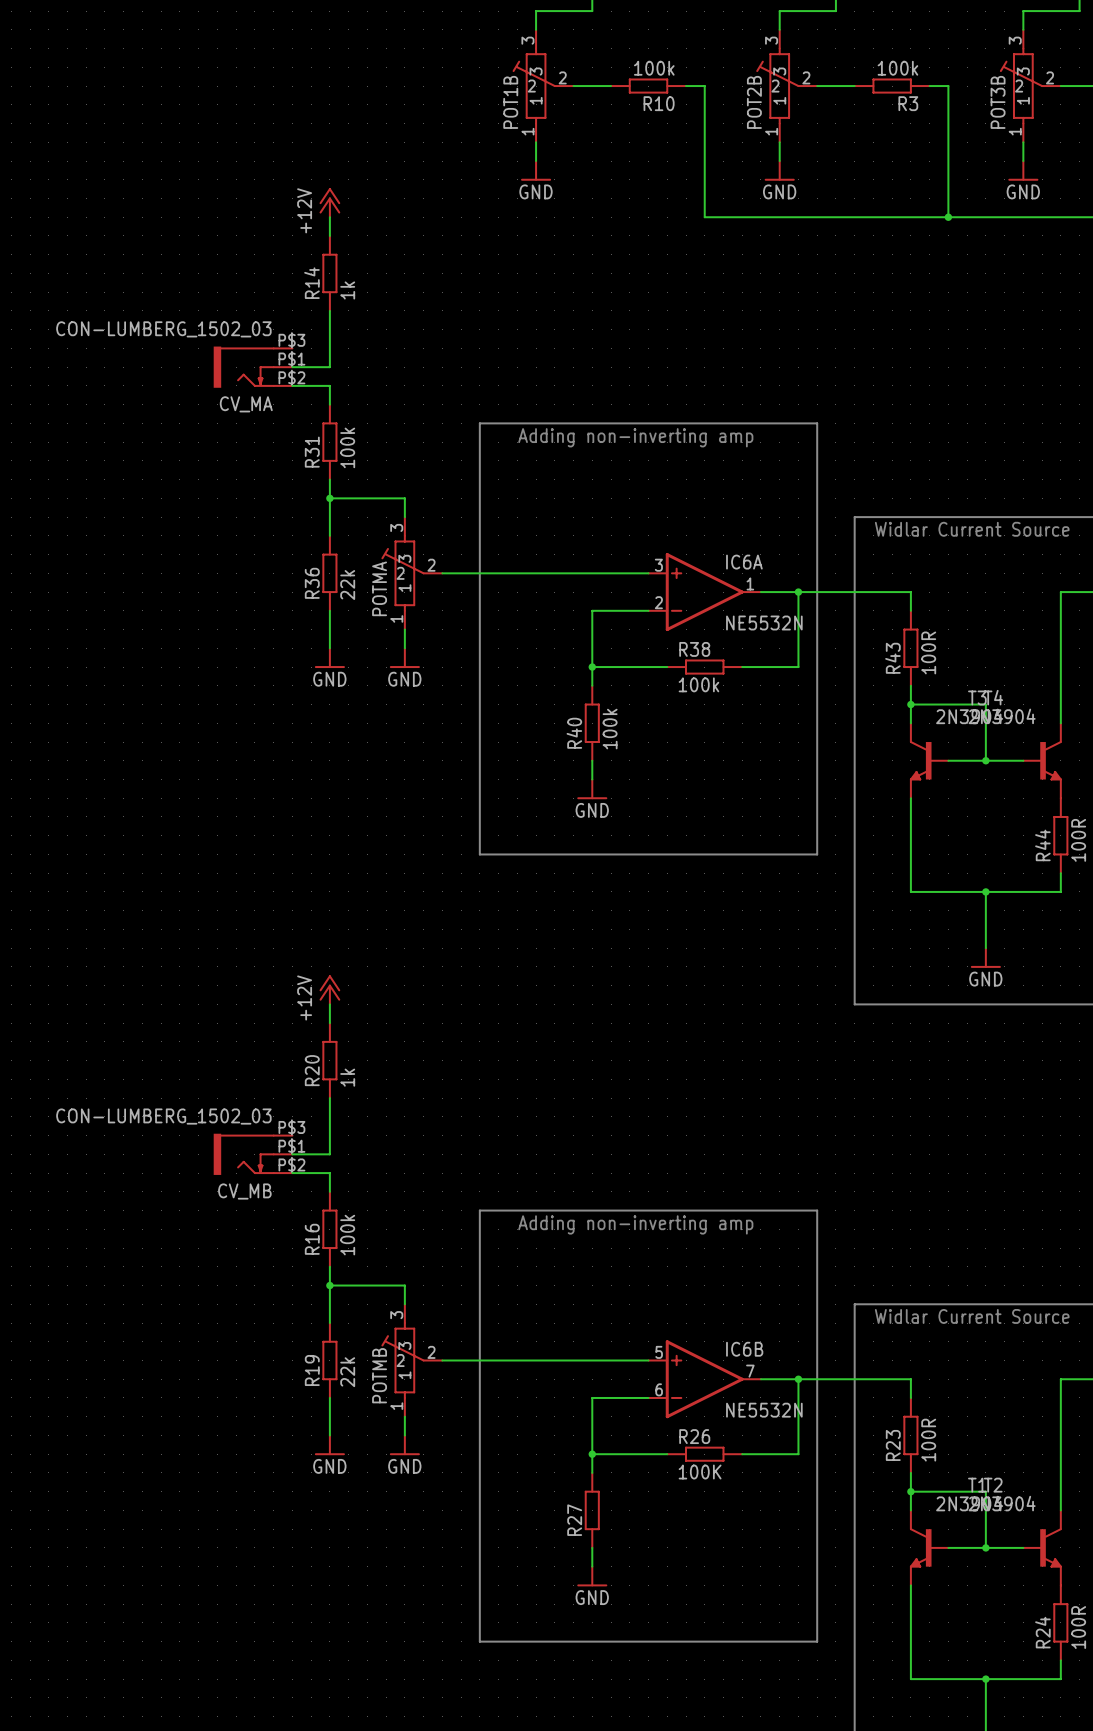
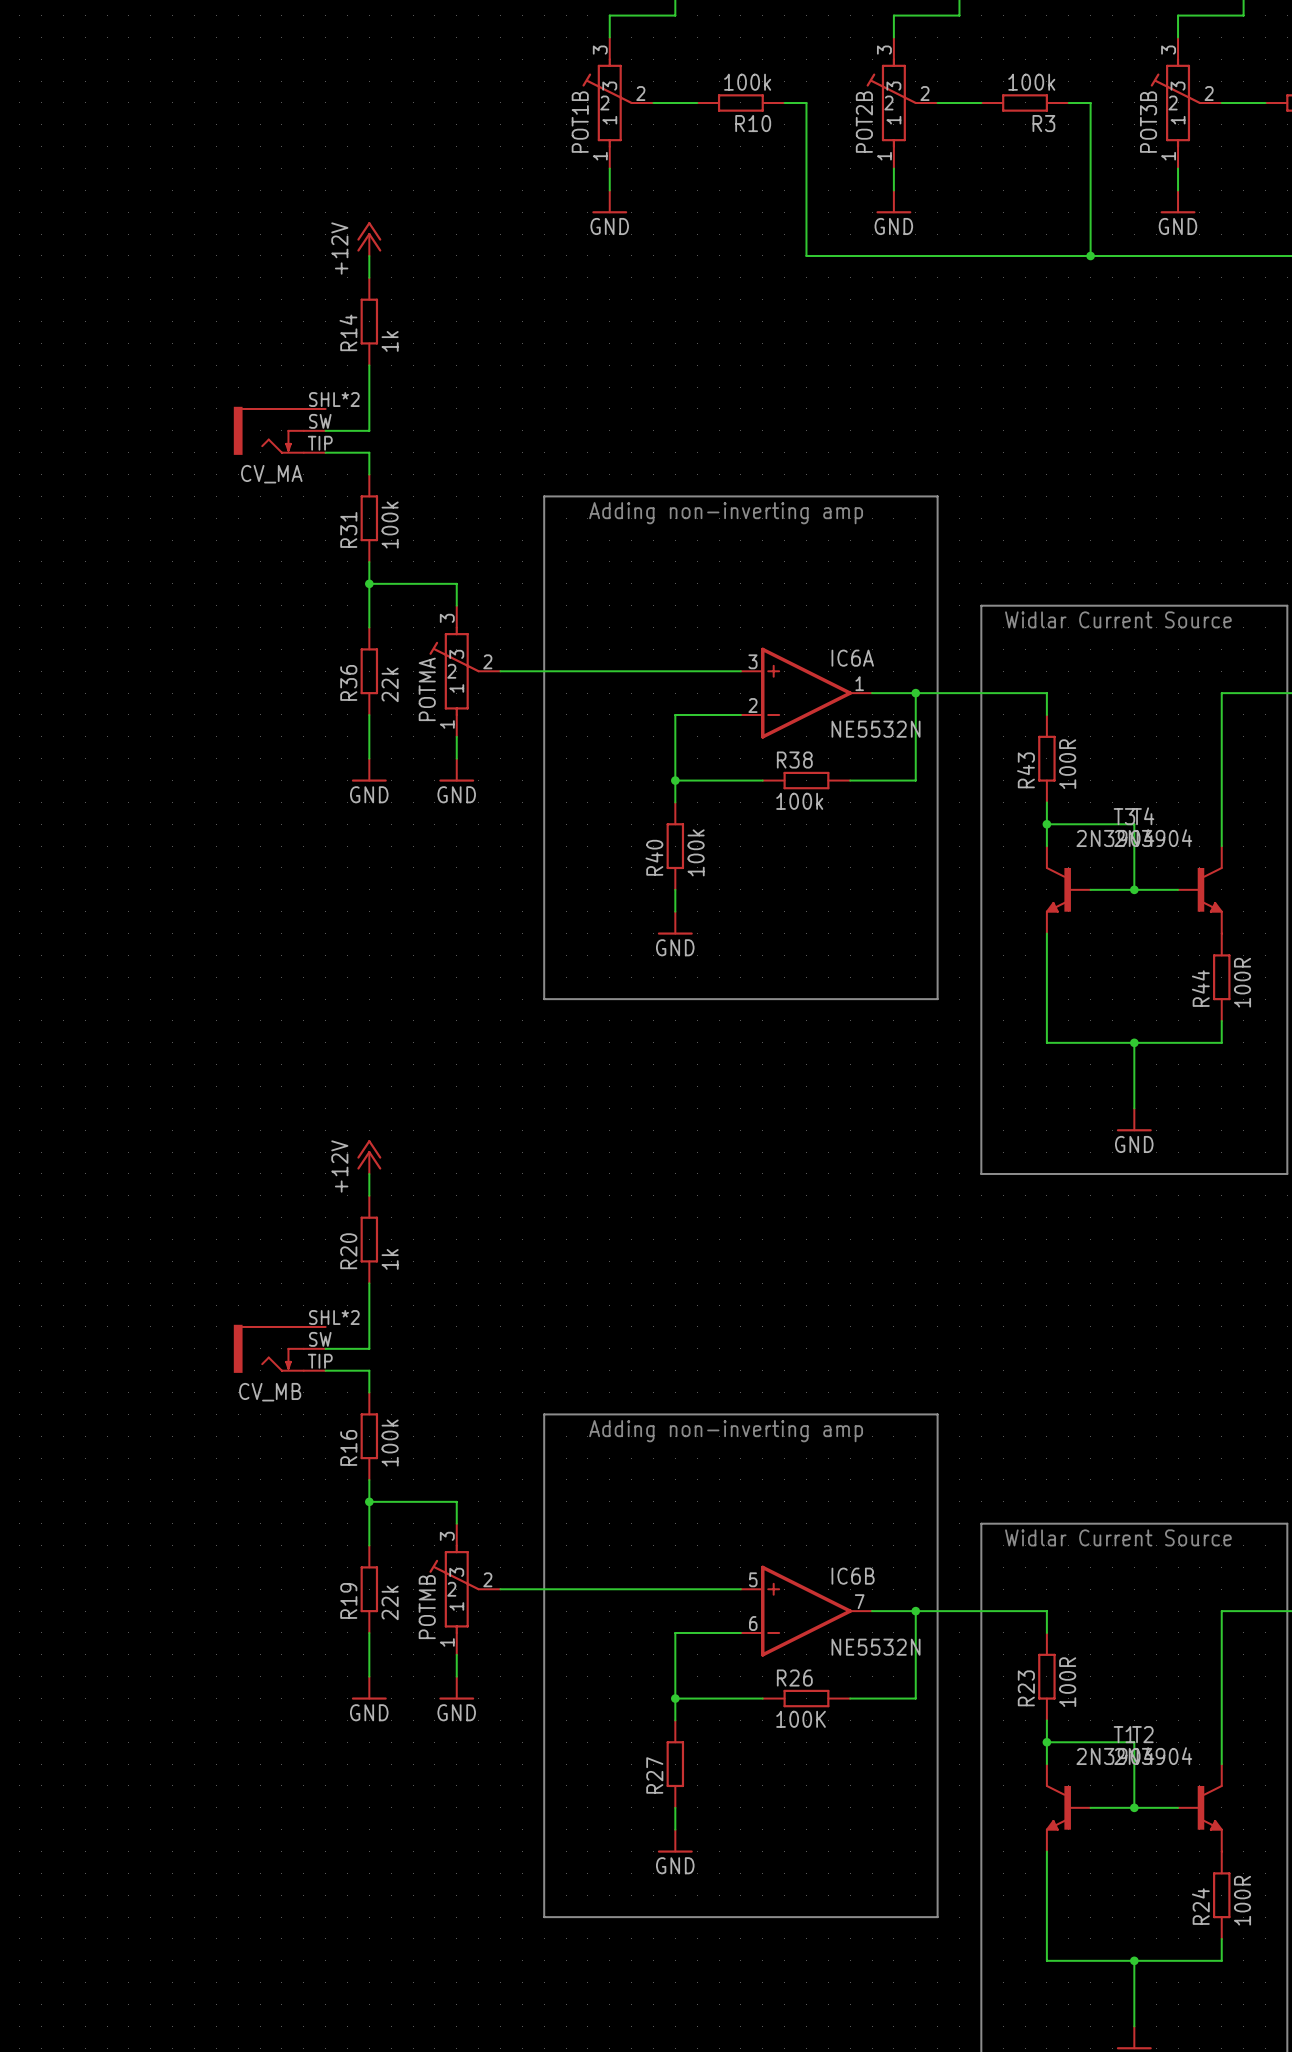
CV_MA value: CON-LUMBERG_1502_03 (163, 329) -> none
CV_MA pin number: P$3 (291, 340) -> SHL*2 (334, 399)
CV_MA pin number: P$1 (291, 359) -> SW (320, 421)
CV_MA pin number: P$2 (291, 377) -> TIP (320, 443)
CV_MB value: CON-LUMBERG_1502_03 (163, 1116) -> none
CV_MB pin number: P$3 (291, 1127) -> SHL*2 (334, 1317)
CV_MB pin number: P$1 (291, 1146) -> SW (320, 1339)
CV_MB pin number: P$2 (291, 1164) -> TIP (320, 1361)

